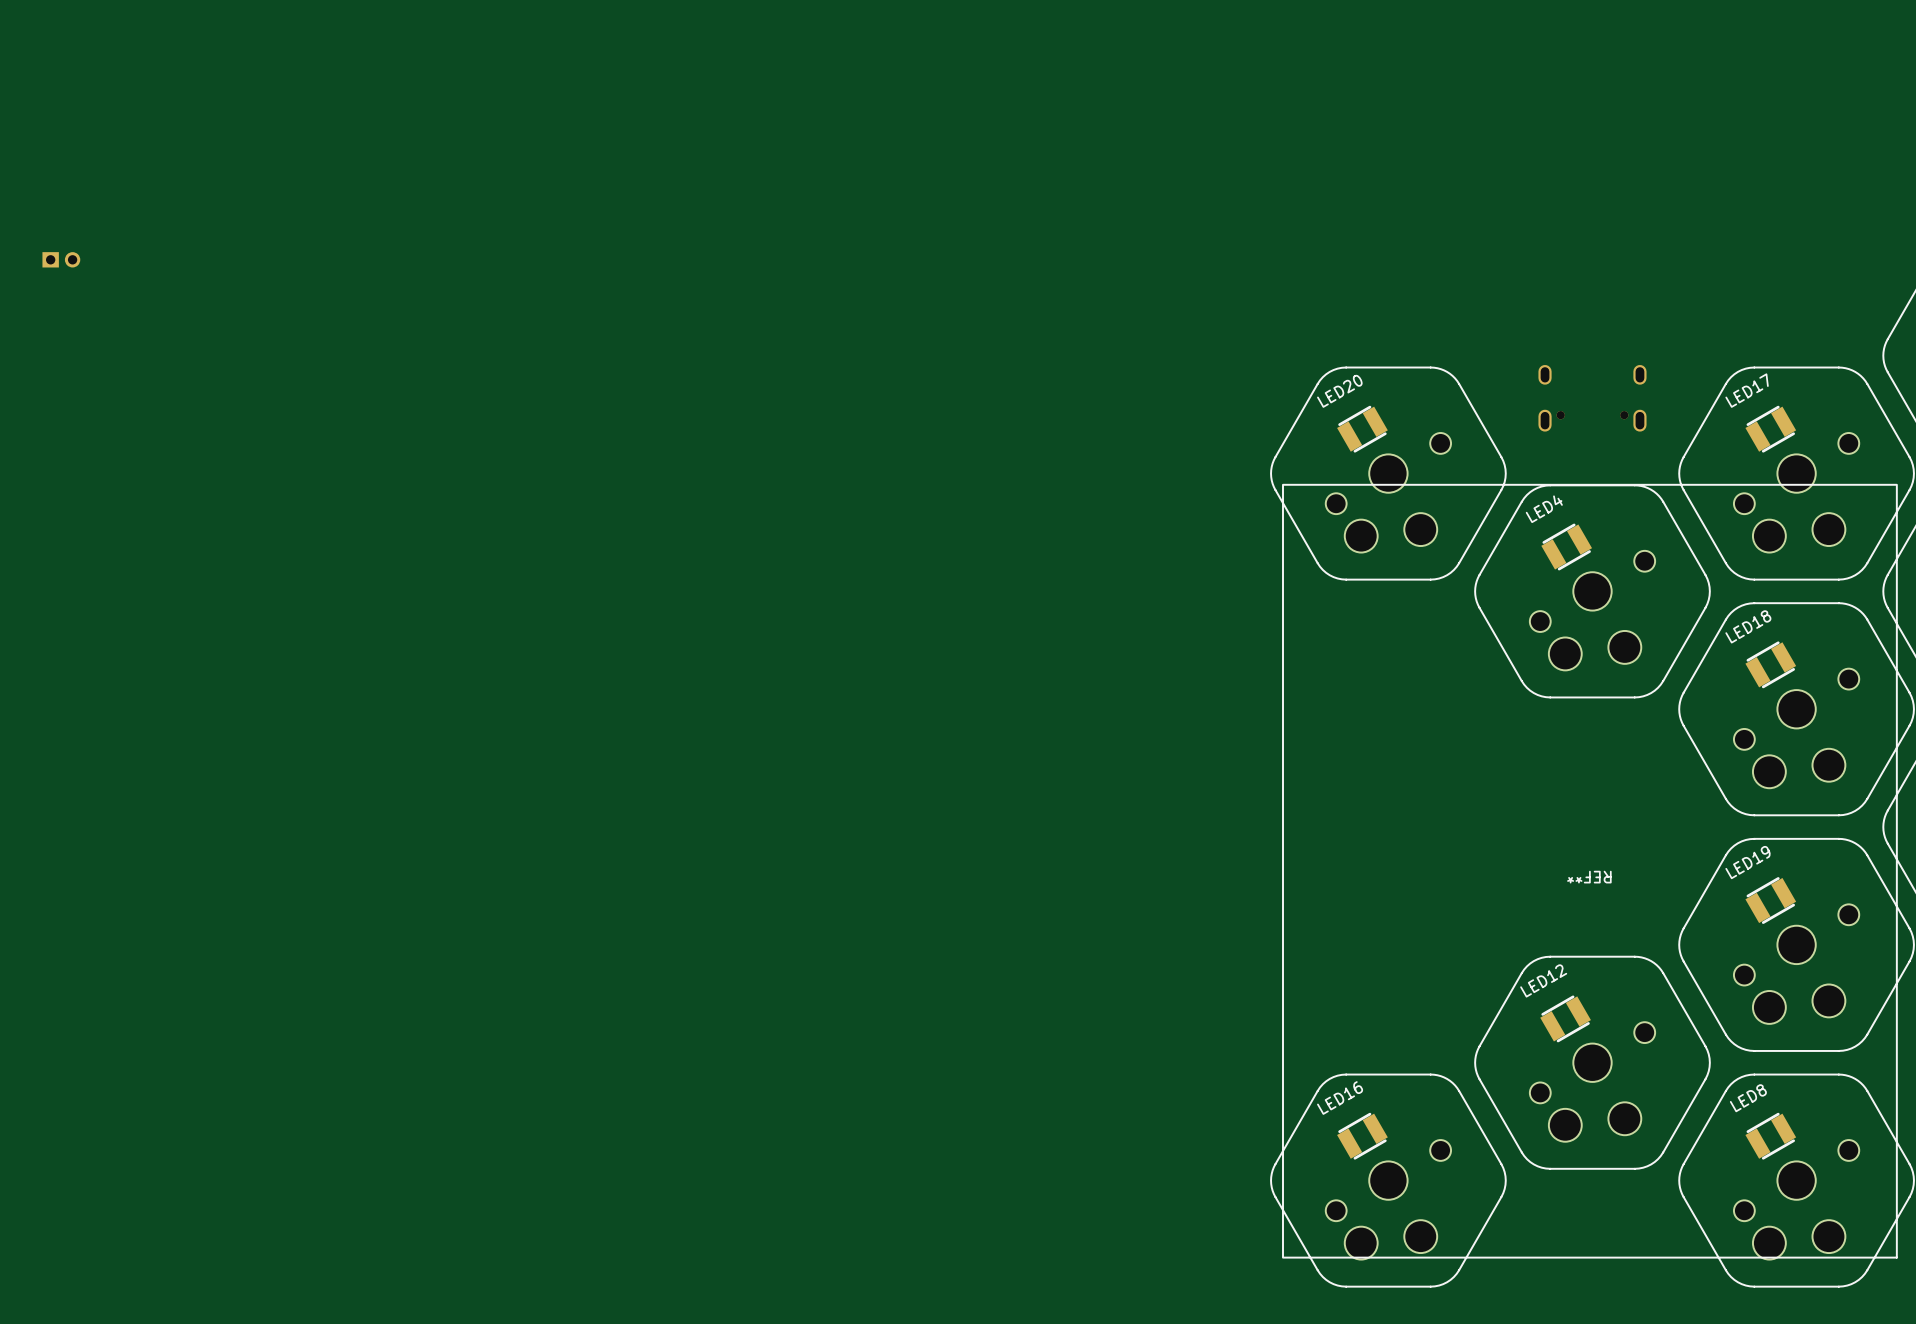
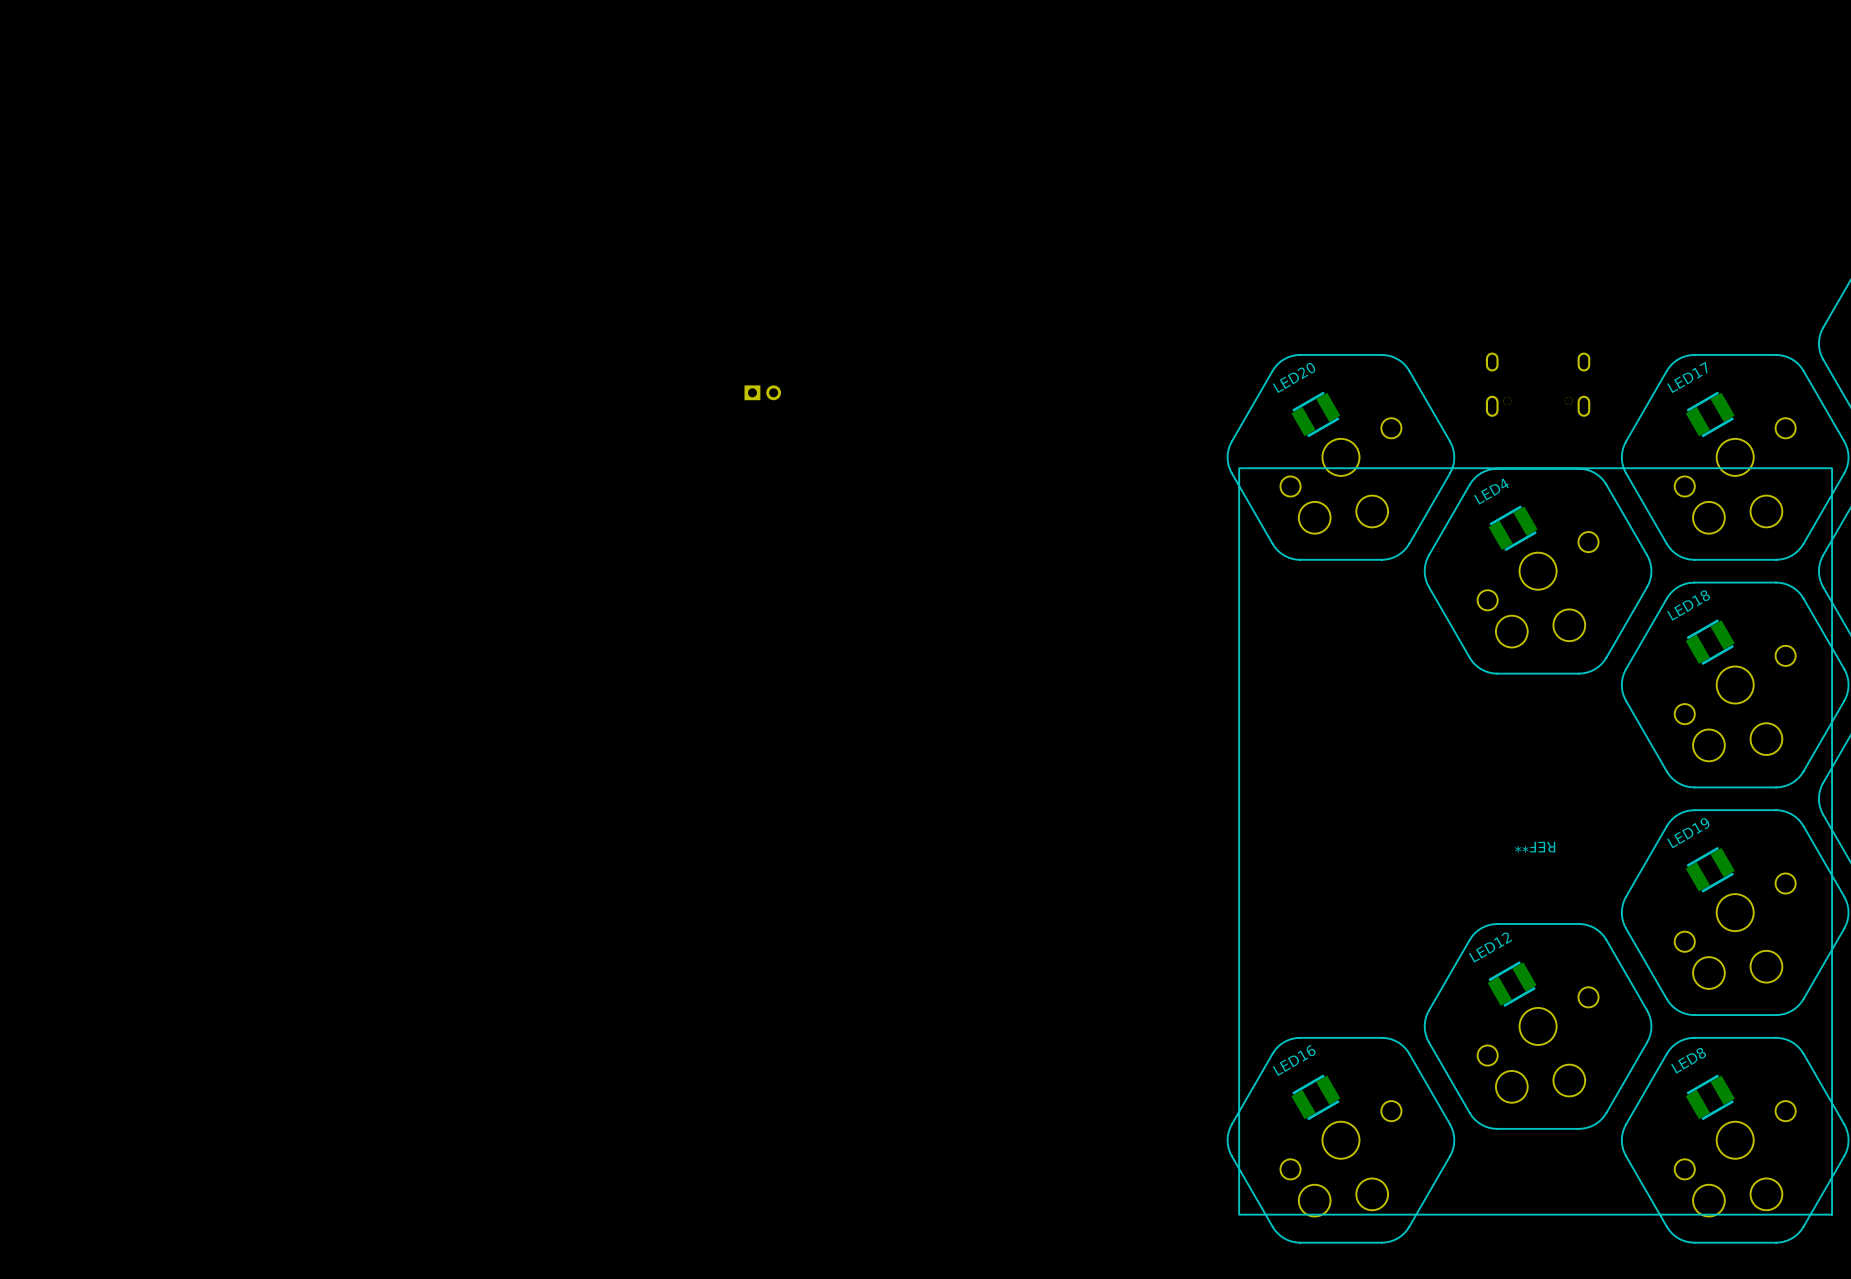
part: (61, 259) -> none
part: none -> (762, 392)

